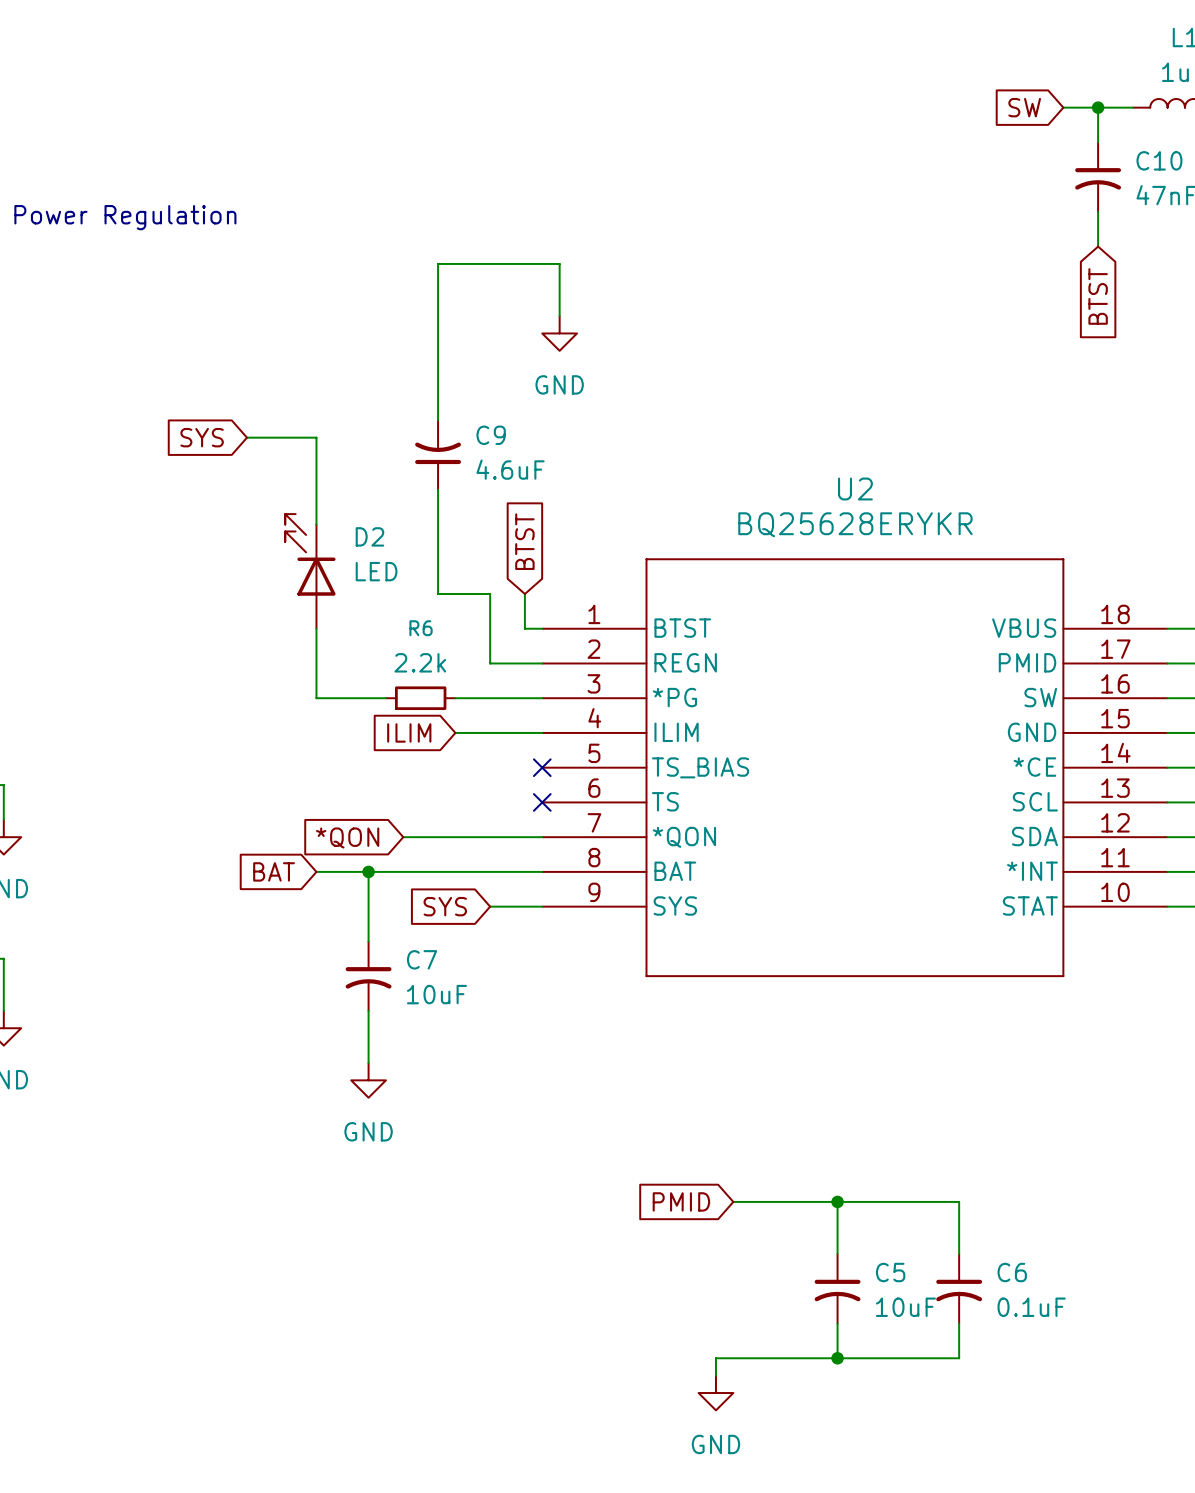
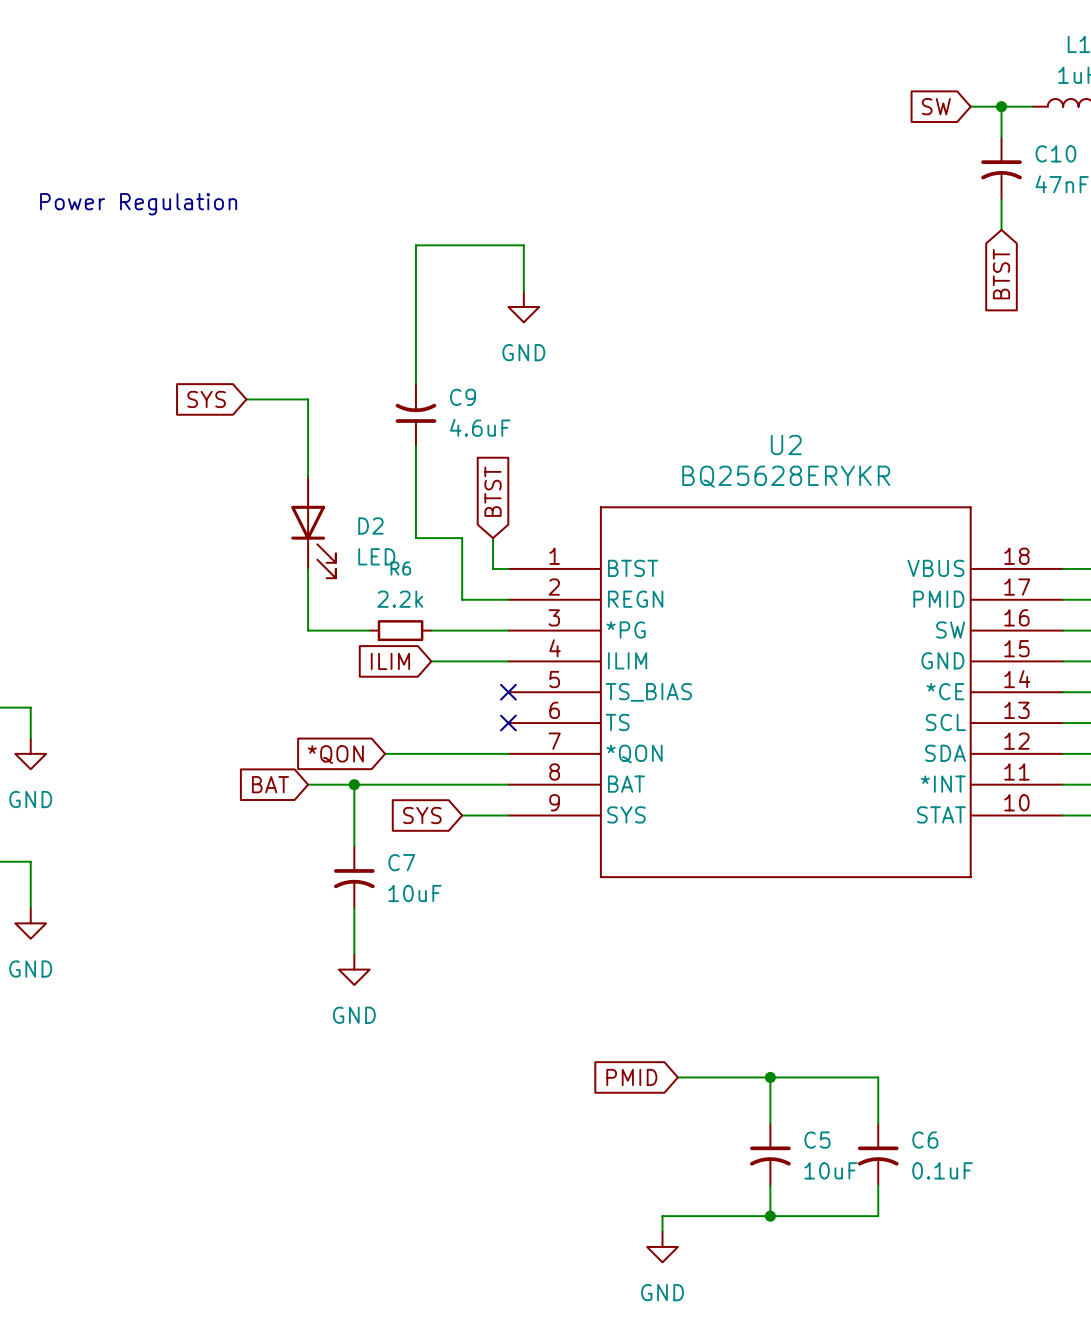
D2 name position: D2 (369, 536) -> D2 (370, 526)
D2 rotation: 0° (310, 554) -> 180° (313, 541)
D2 value position: LED (376, 571) -> LED (376, 556)

